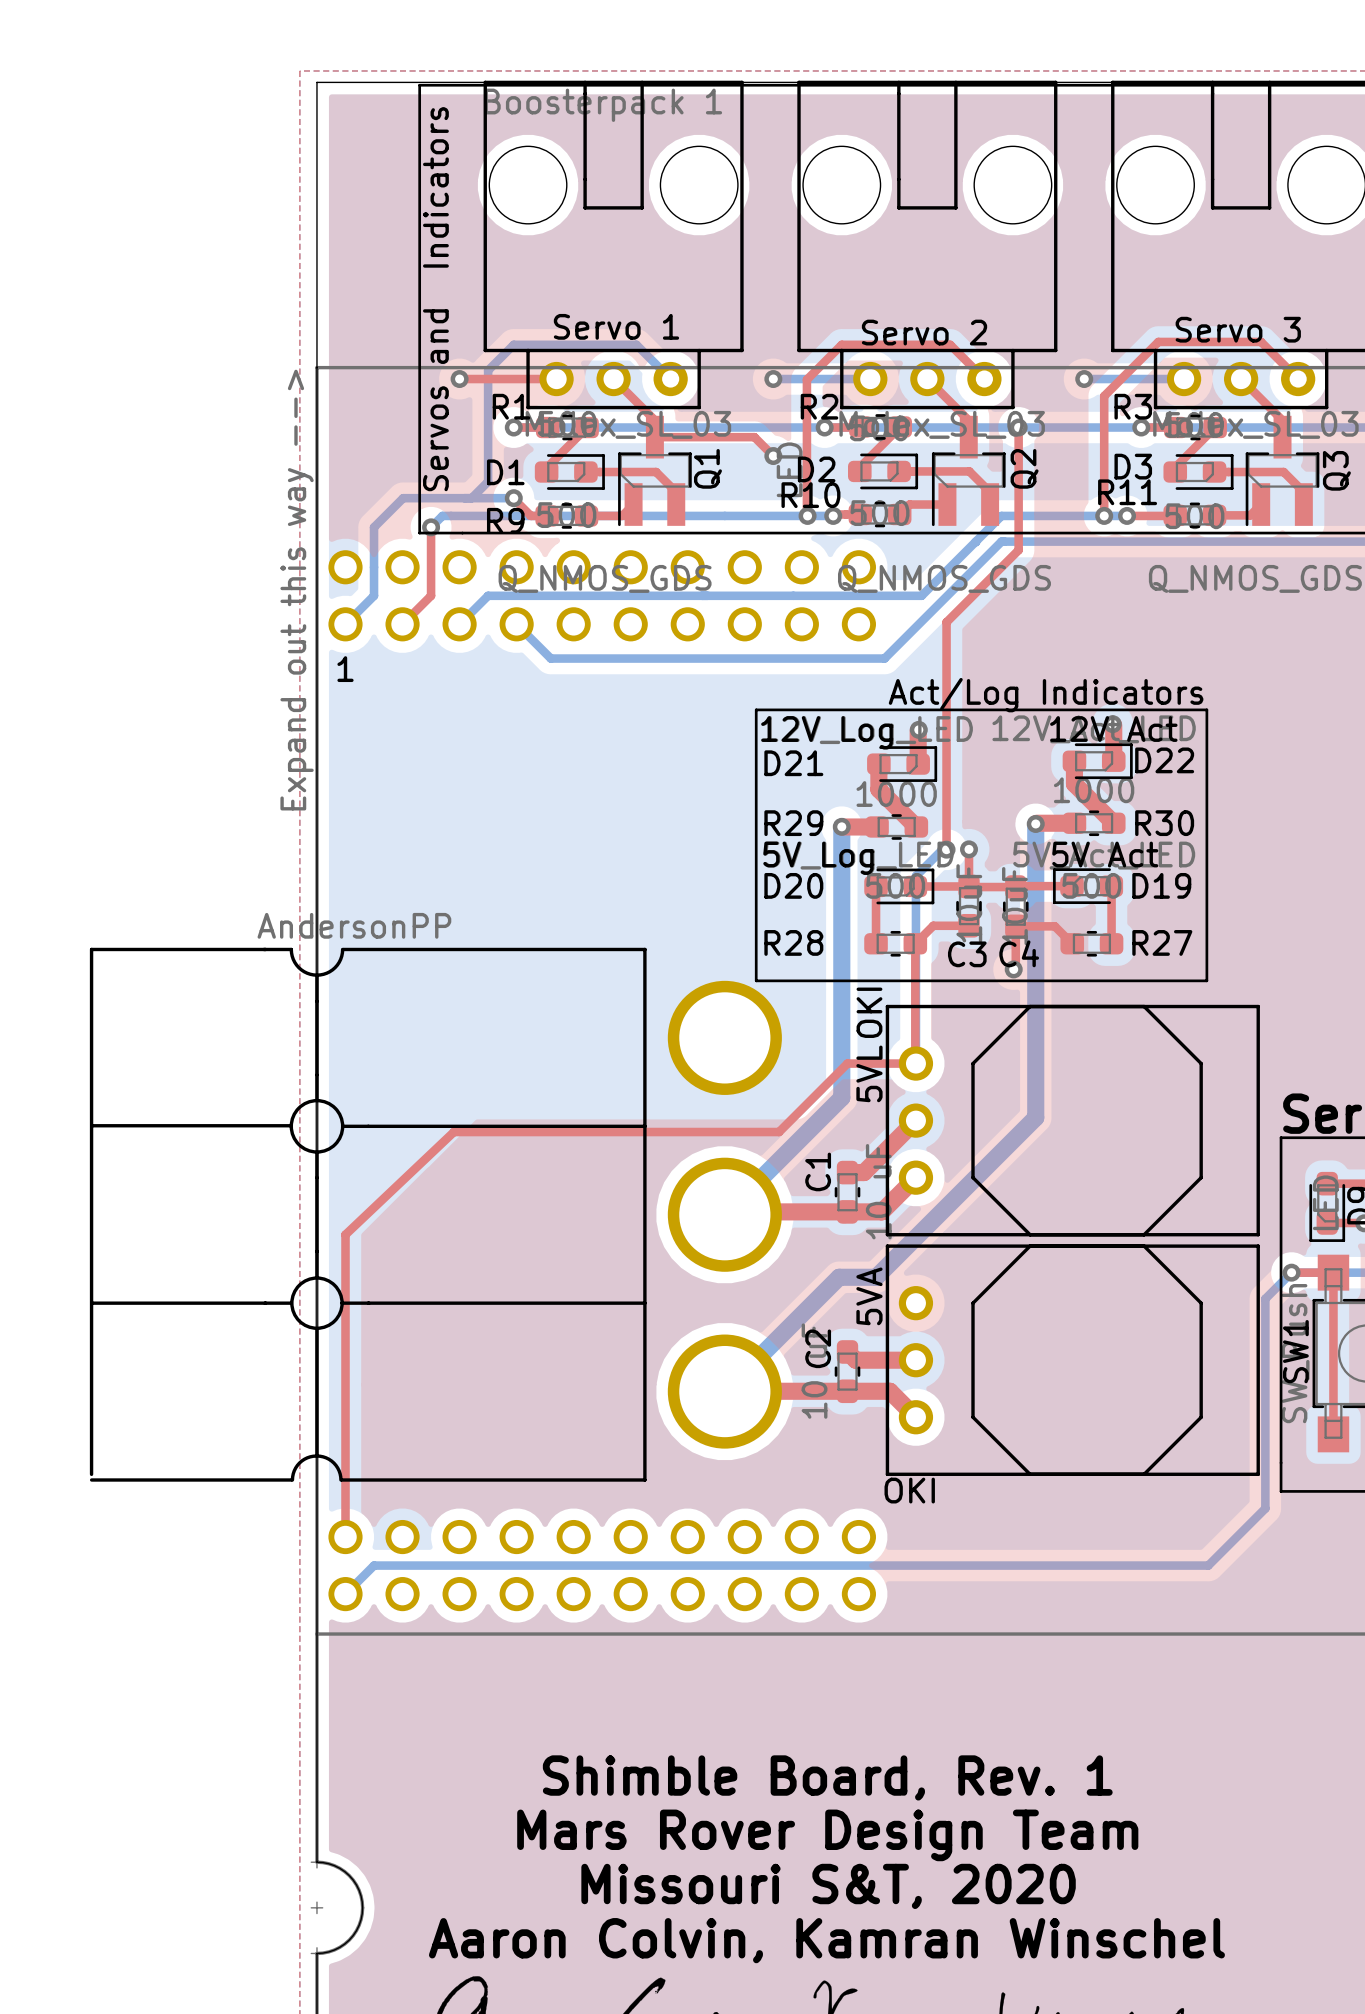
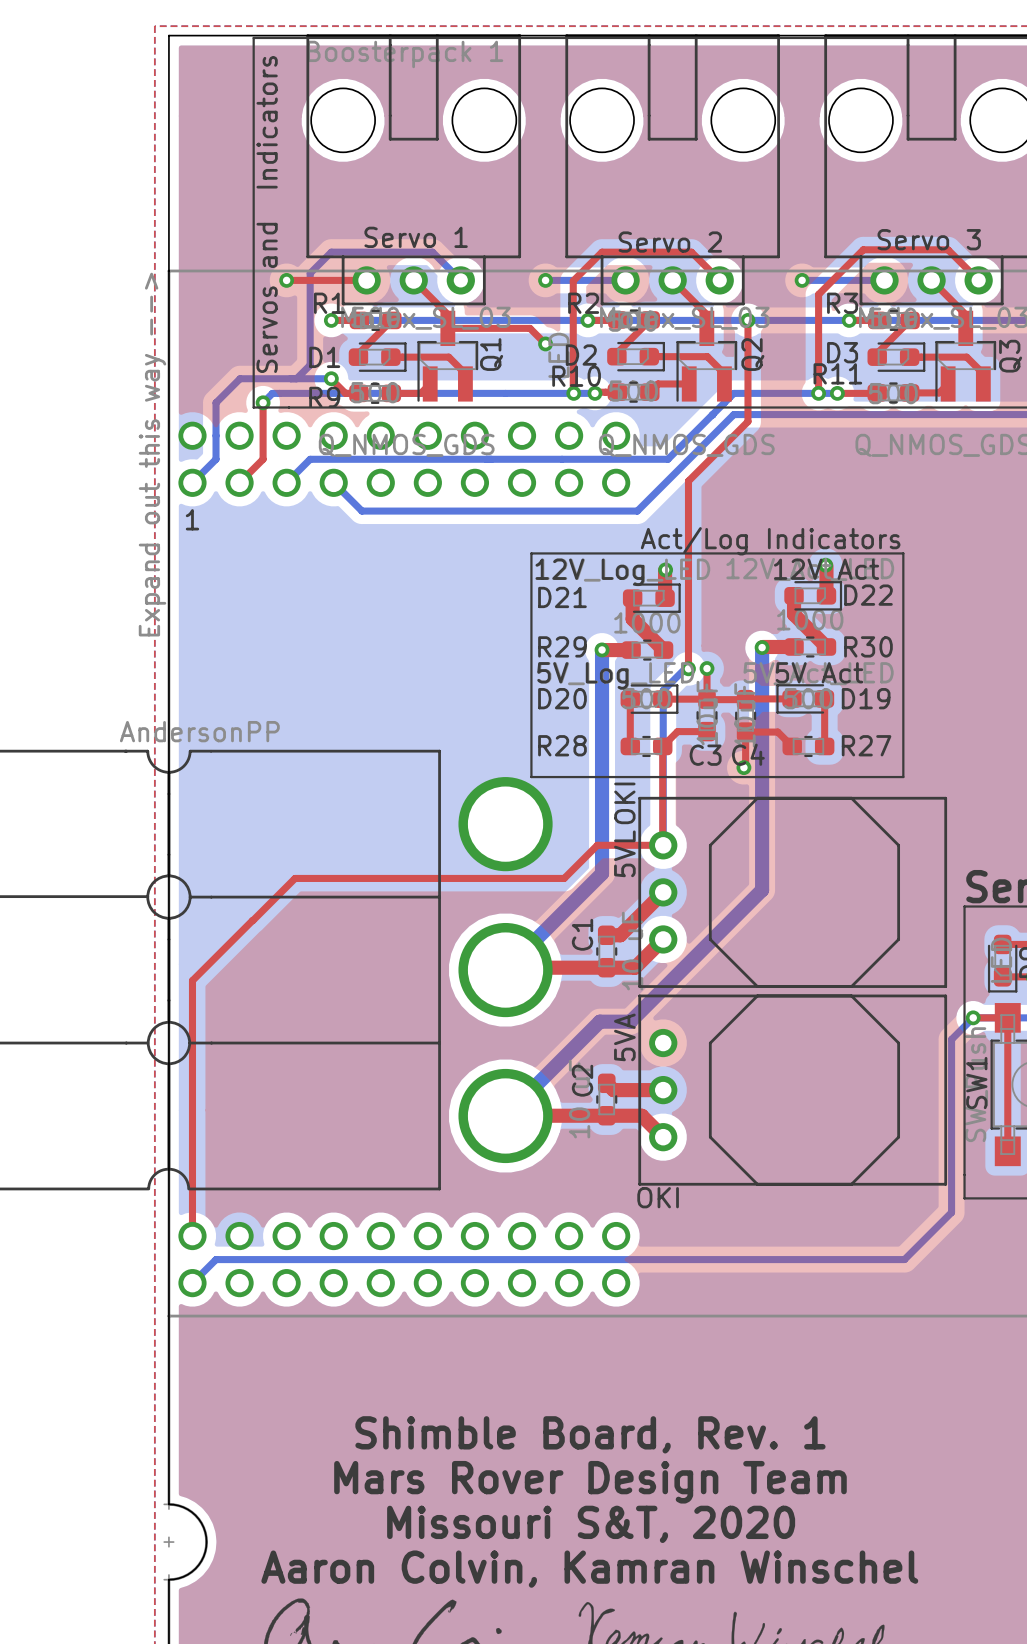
top track: (847, 1063) (779, 1132) (453, 1132) (345, 1234) -> (606, 845) (597, 845) (564, 878) (295, 878) (252, 920)
top track: none -> (252, 920) (192, 980) (192, 986)

